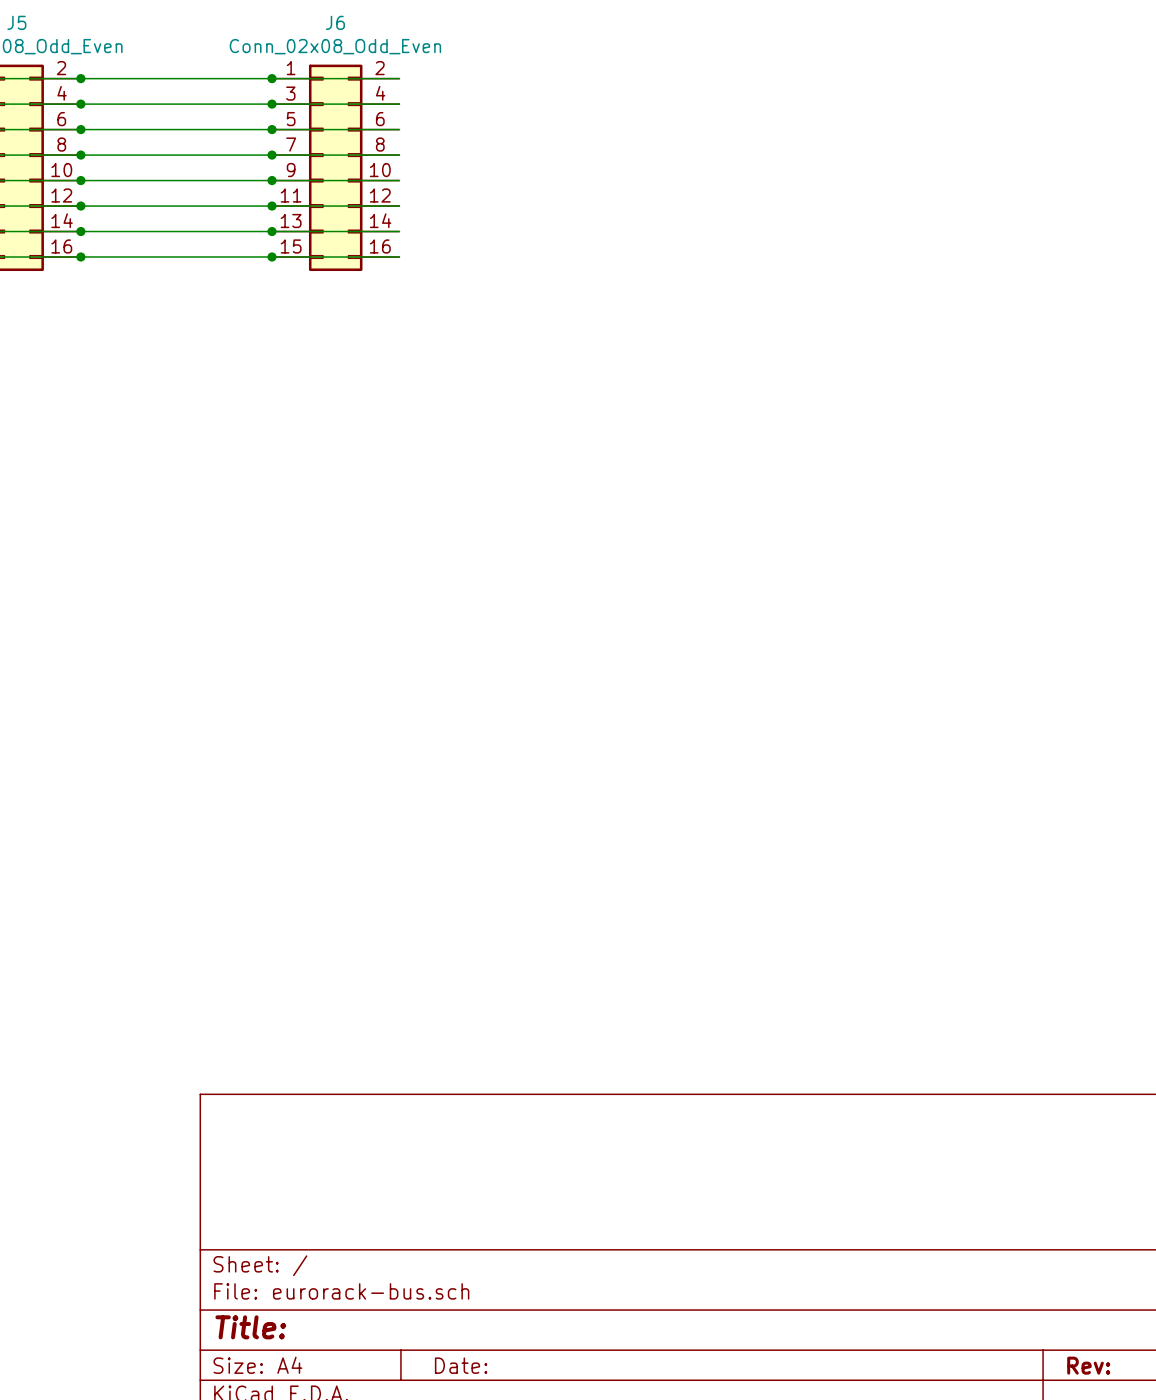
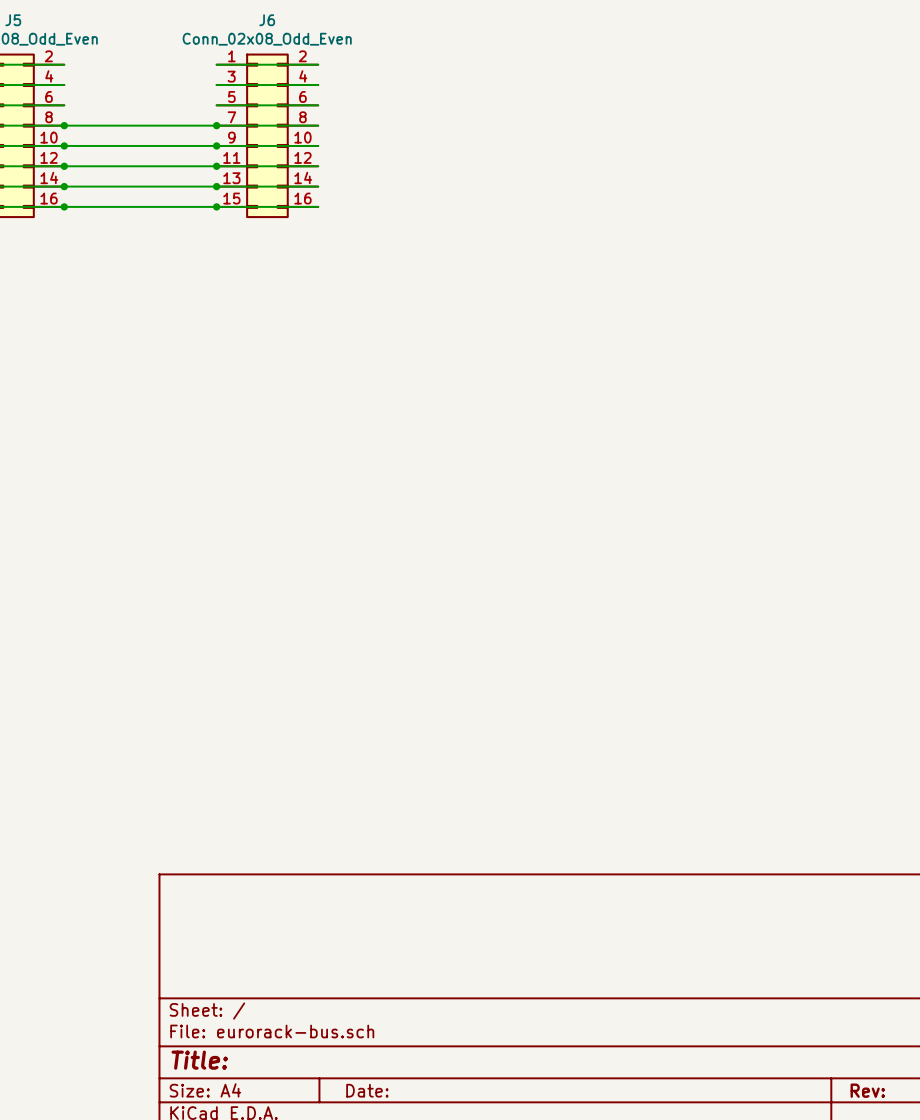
wire: (80, 78) (272, 78) -> none
junction: (80, 78) -> none
junction: (272, 78) -> none
wire: (80, 104) (272, 104) -> none
junction: (80, 104) -> none
junction: (272, 104) -> none
wire: (80, 129) (272, 129) -> none
junction: (80, 129) -> none
junction: (272, 129) -> none

